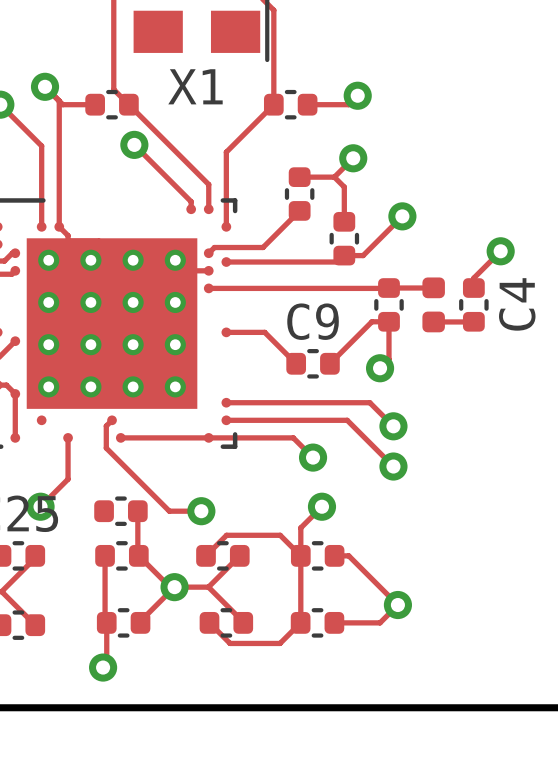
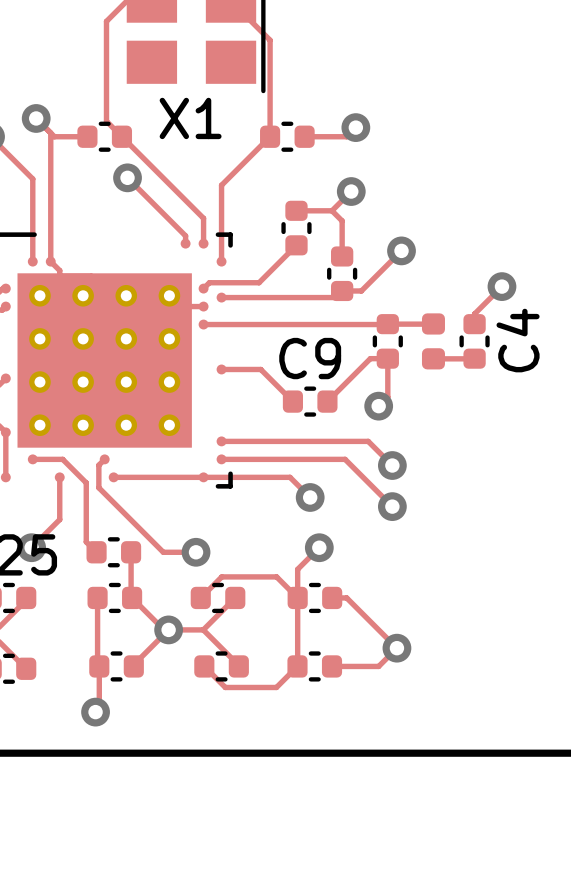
track: none -> (32, 459) (62, 459) (86, 482) (86, 541) (96, 552)

